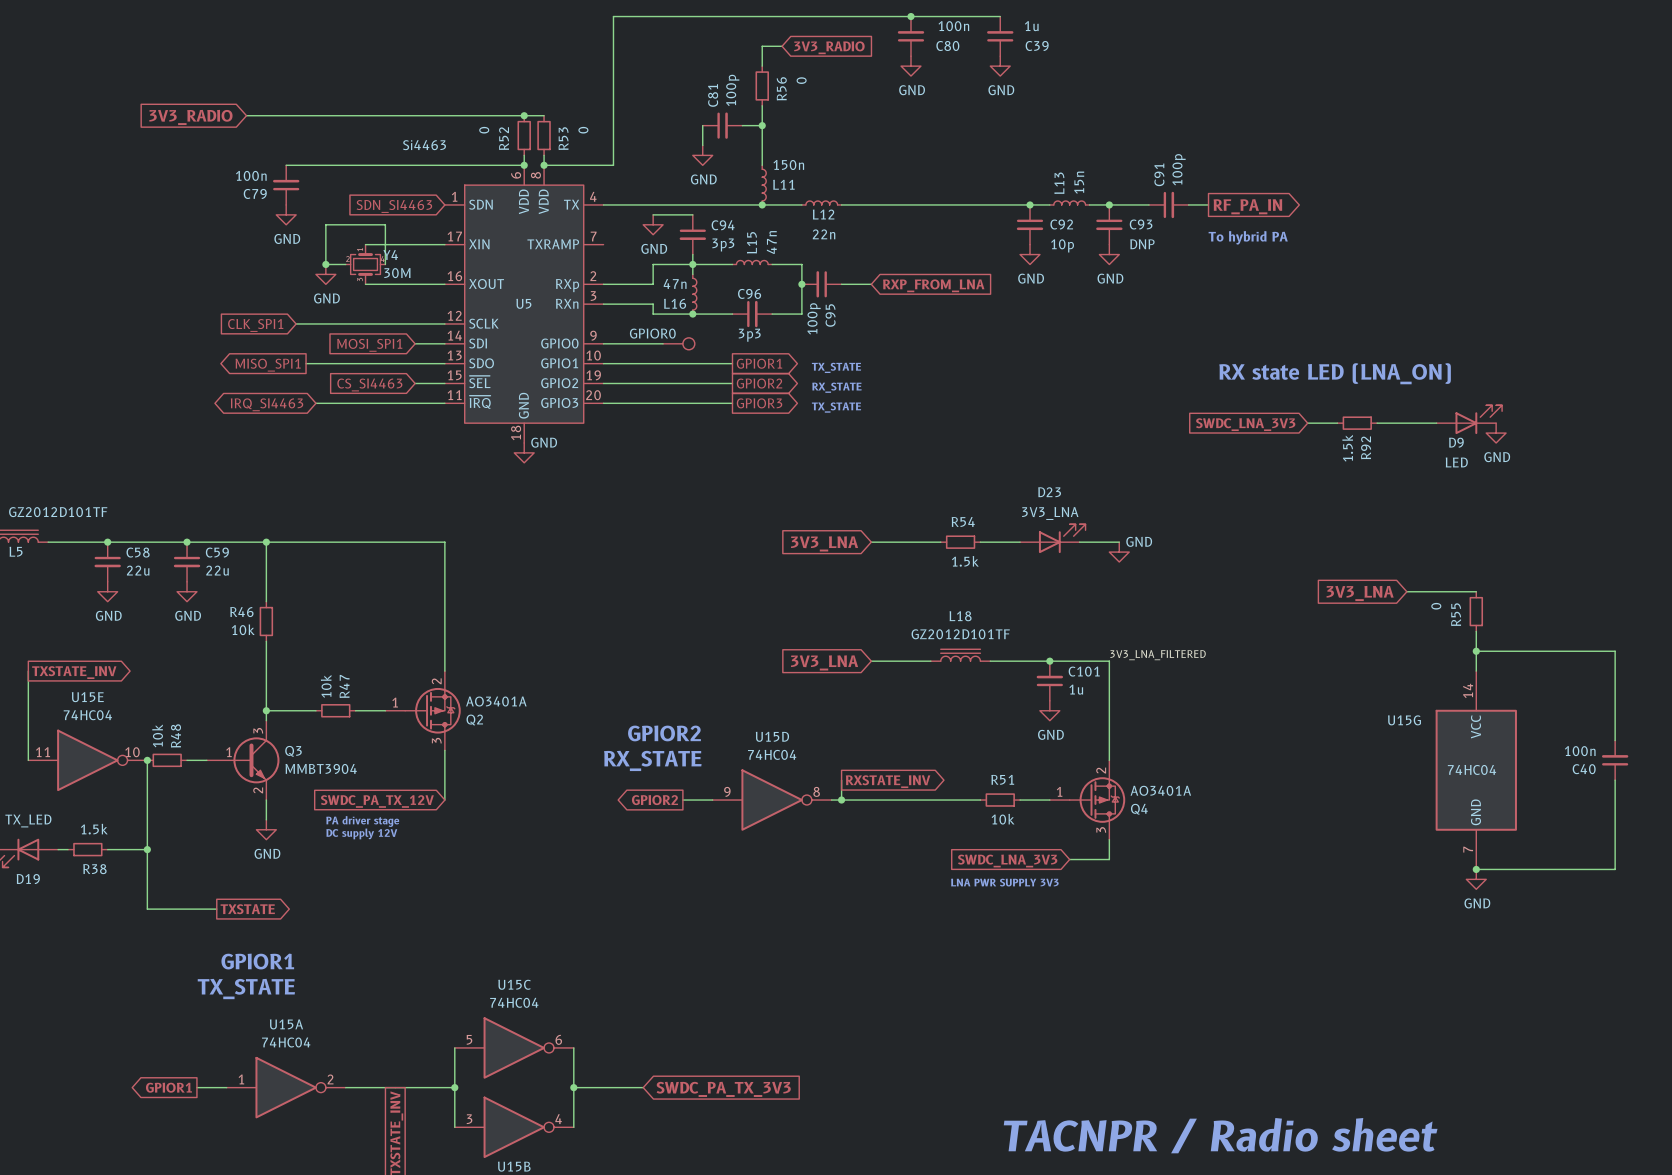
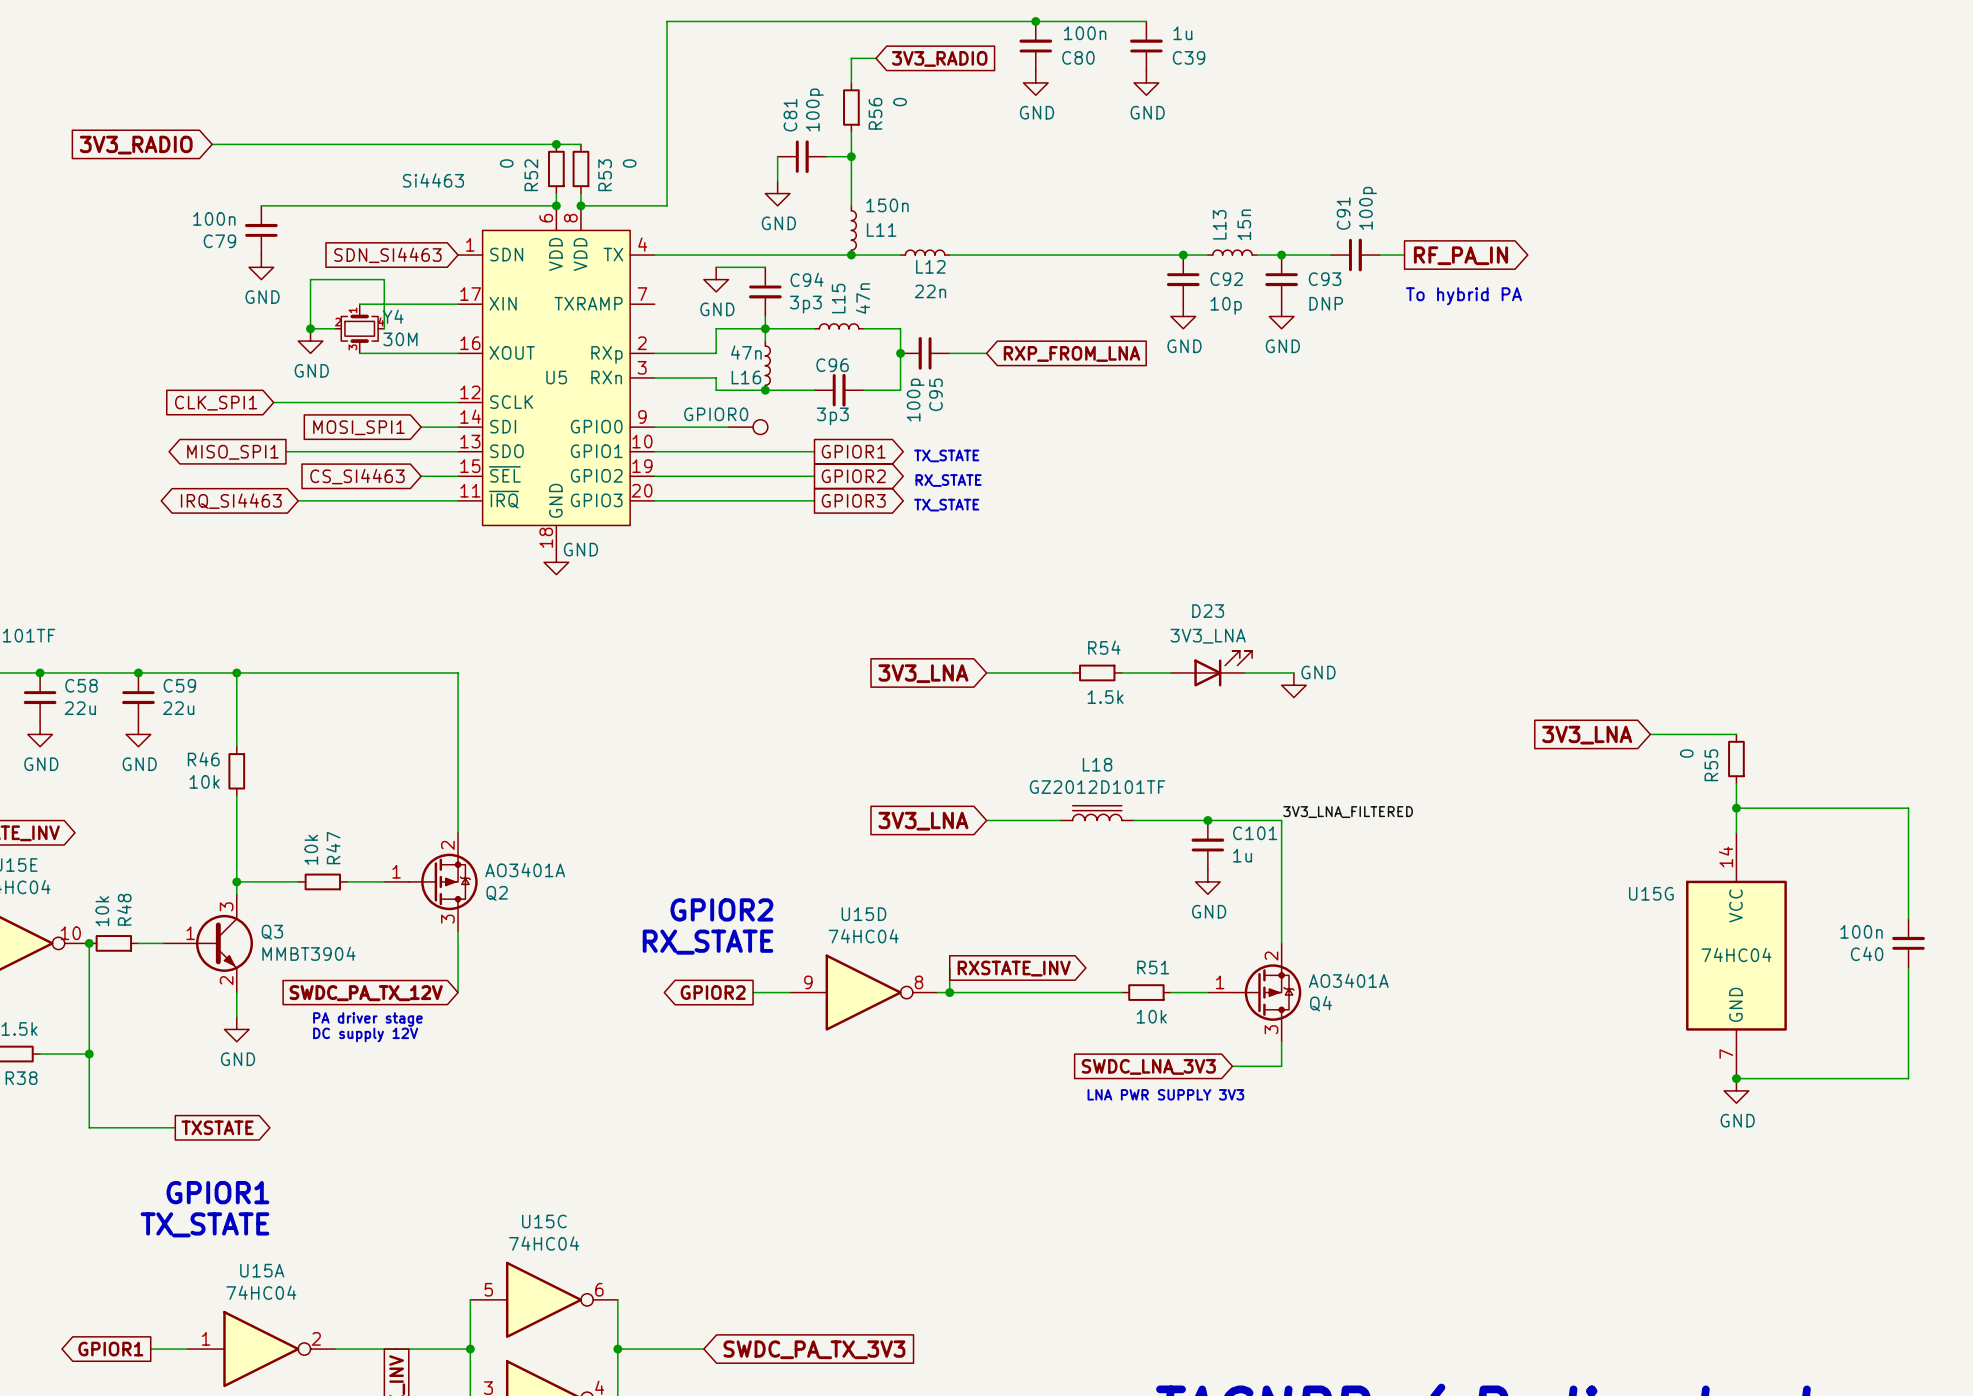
text: RX state LED (LNA_ON) (1335, 373) -> none
D9: LED (1469, 419) -> none
wire: (1307, 423) (1337, 423) -> none
R92: 1.5k (1357, 423) -> none
wire: (1377, 423) (1436, 423) -> none
global label: SWDC_LNA_3V3 (1245, 424) -> none
power symbol: GND (1496, 433) -> none

